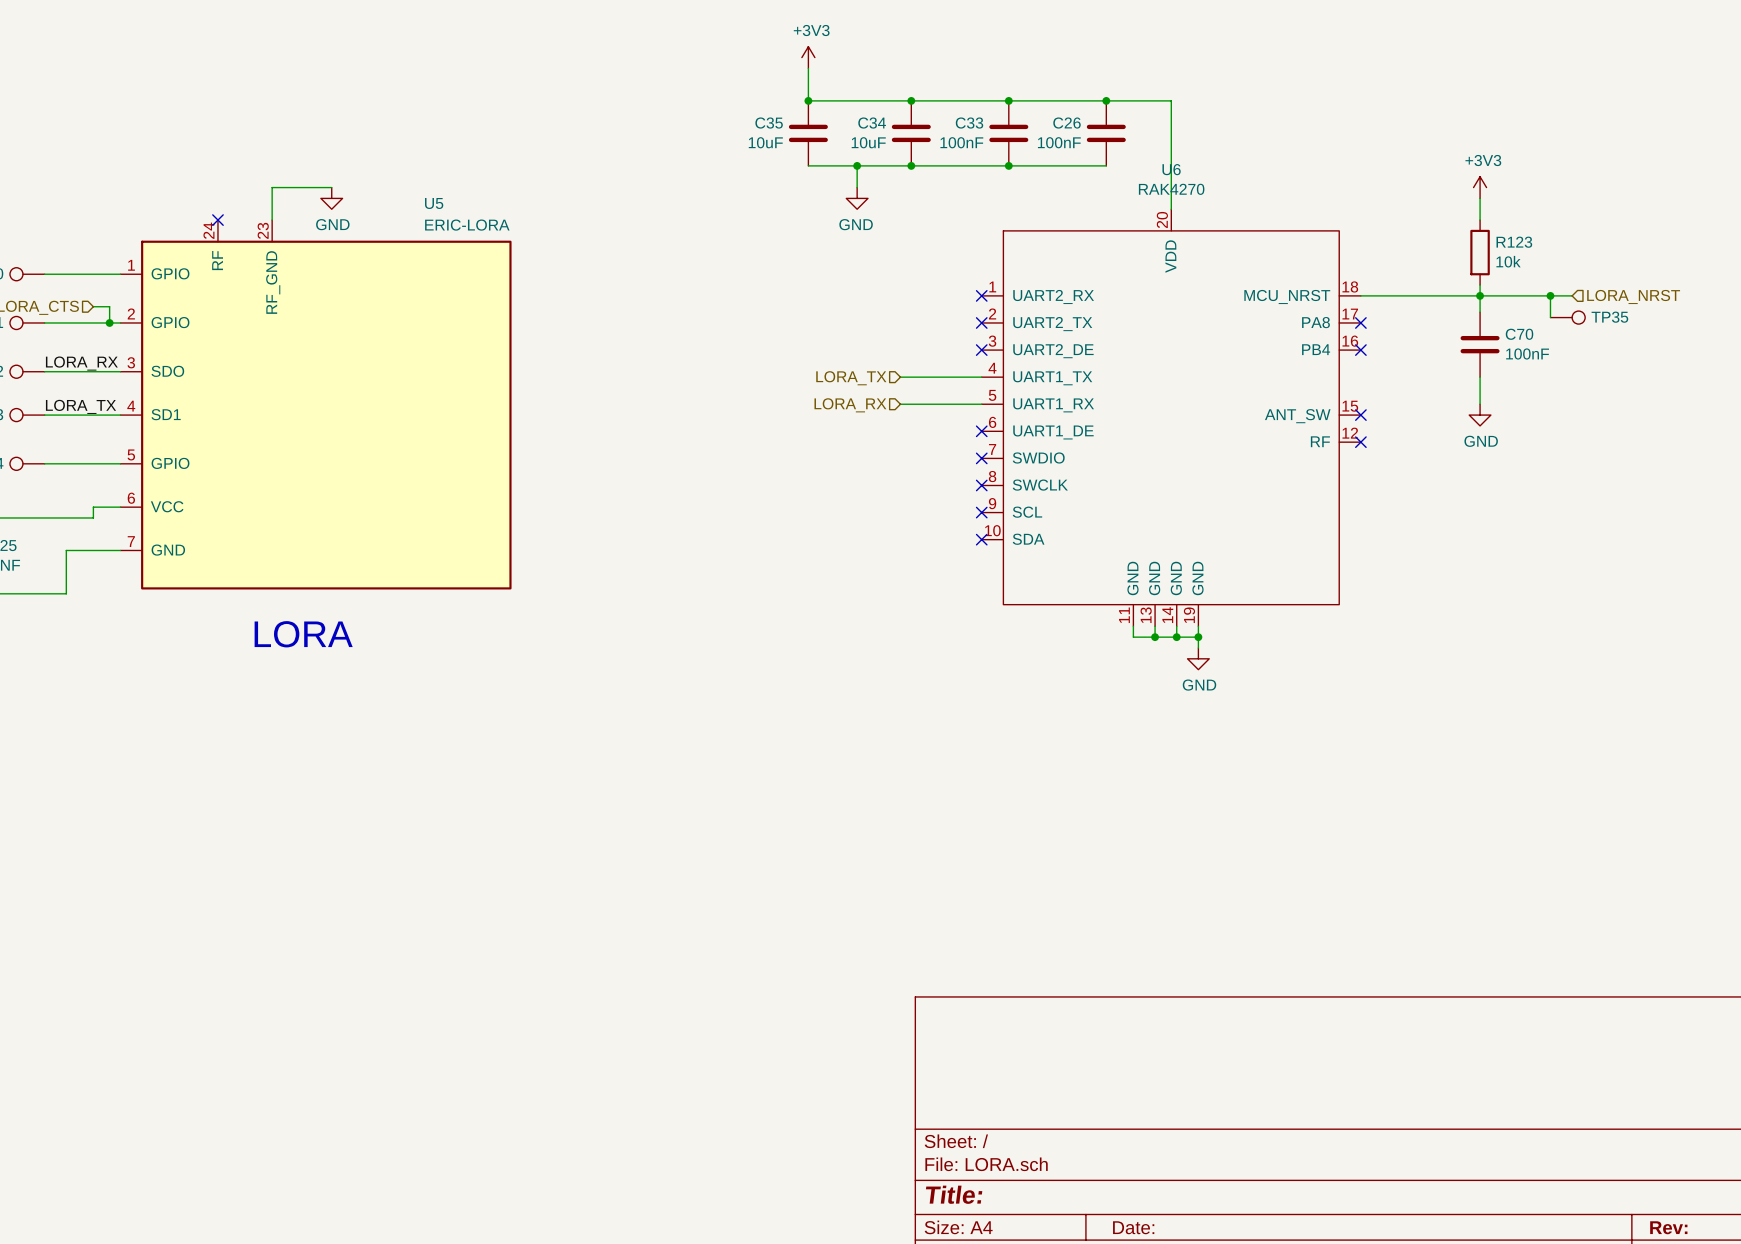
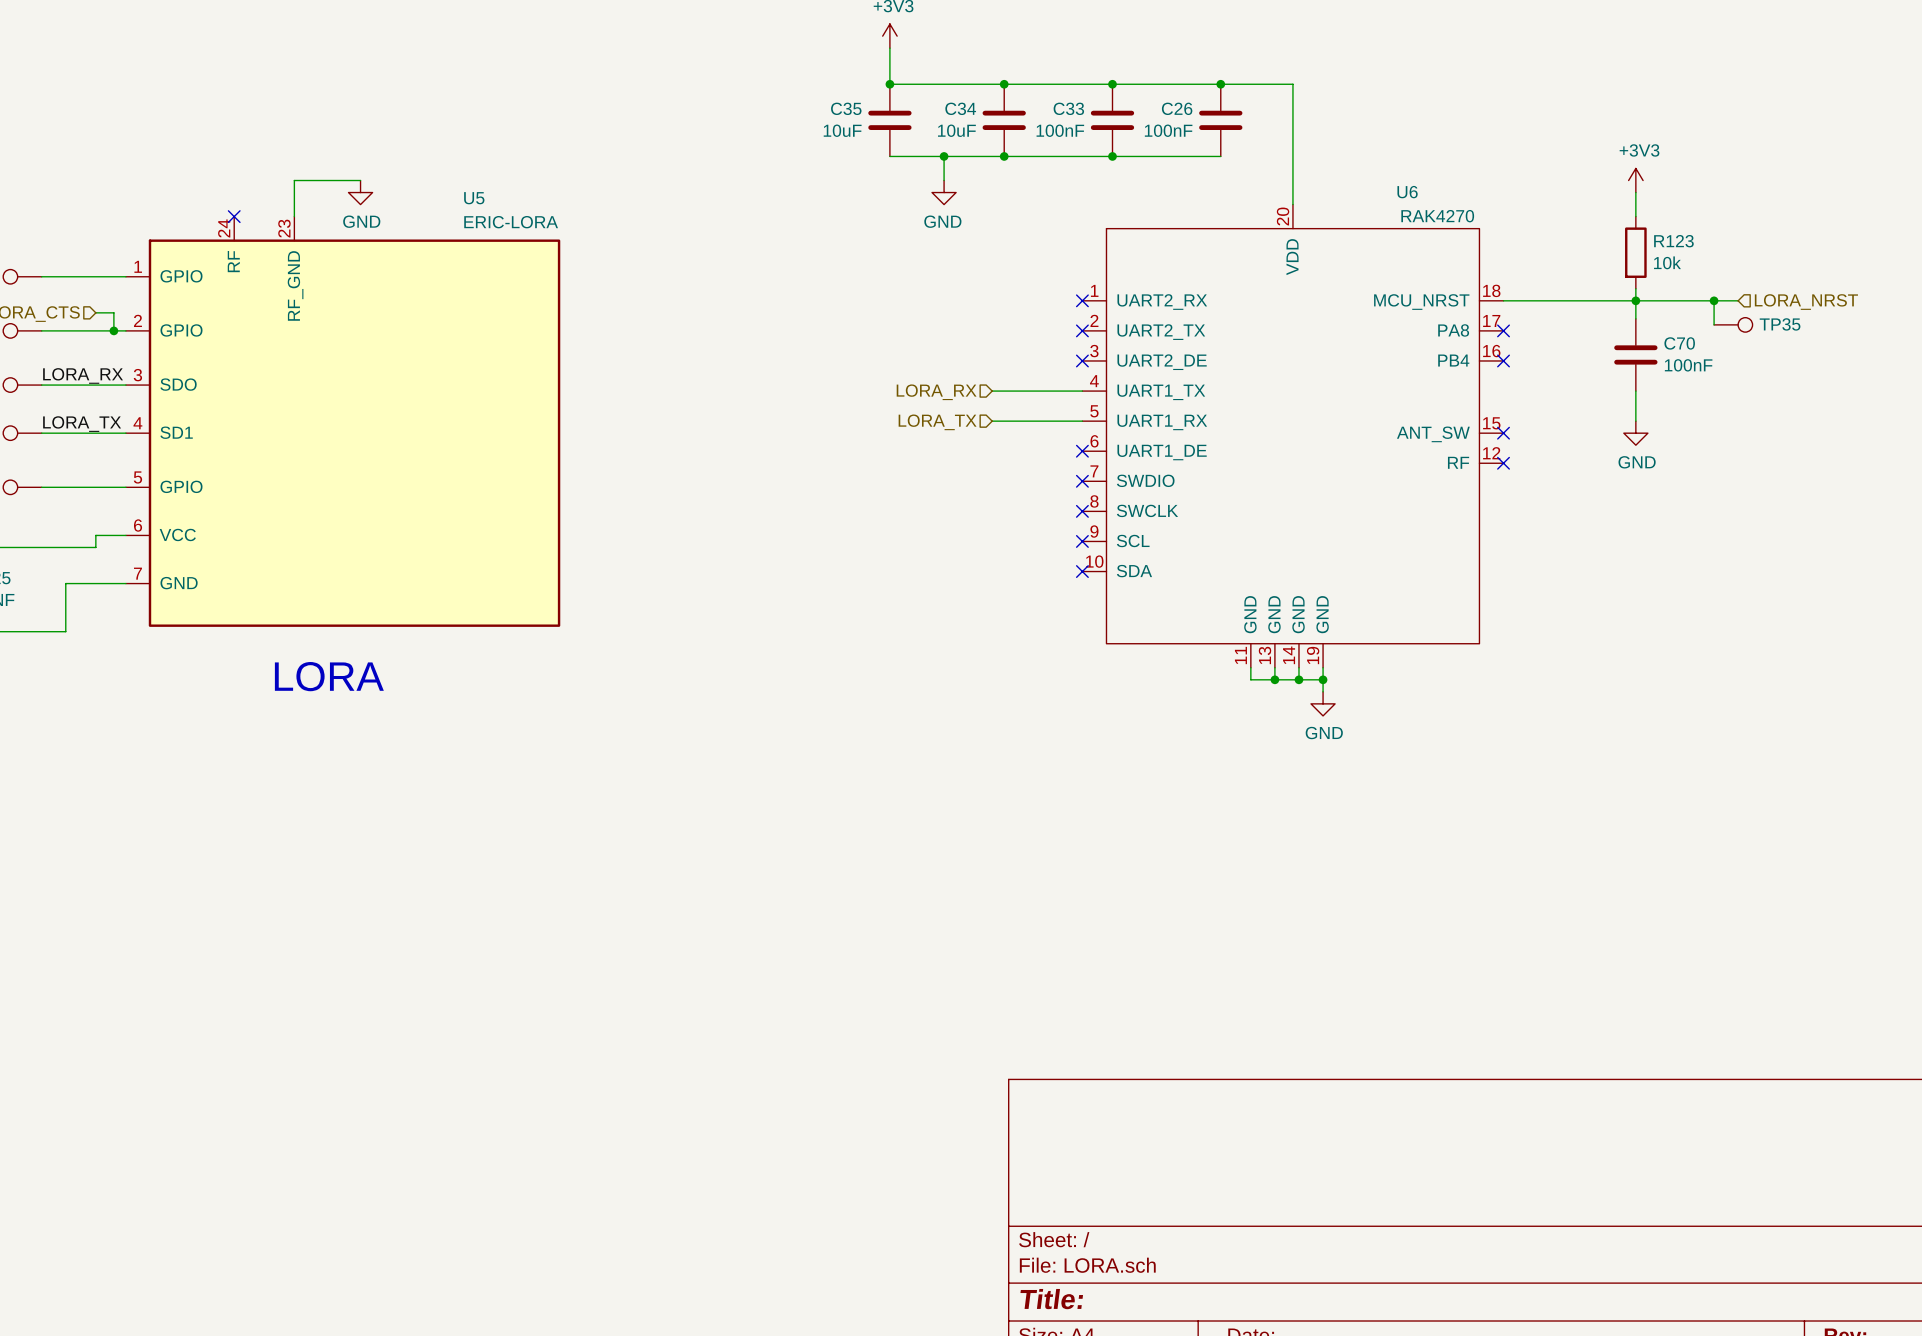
U6 name position: U6 (1171, 169) -> U6 (1407, 192)
U6 value position: RAK4270 (1171, 189) -> RAK4270 (1437, 216)
hierarchical label: LORA_TX (851, 378) -> LORA_RX (936, 392)
hierarchical label: LORA_RX (850, 405) -> LORA_TX (937, 422)

